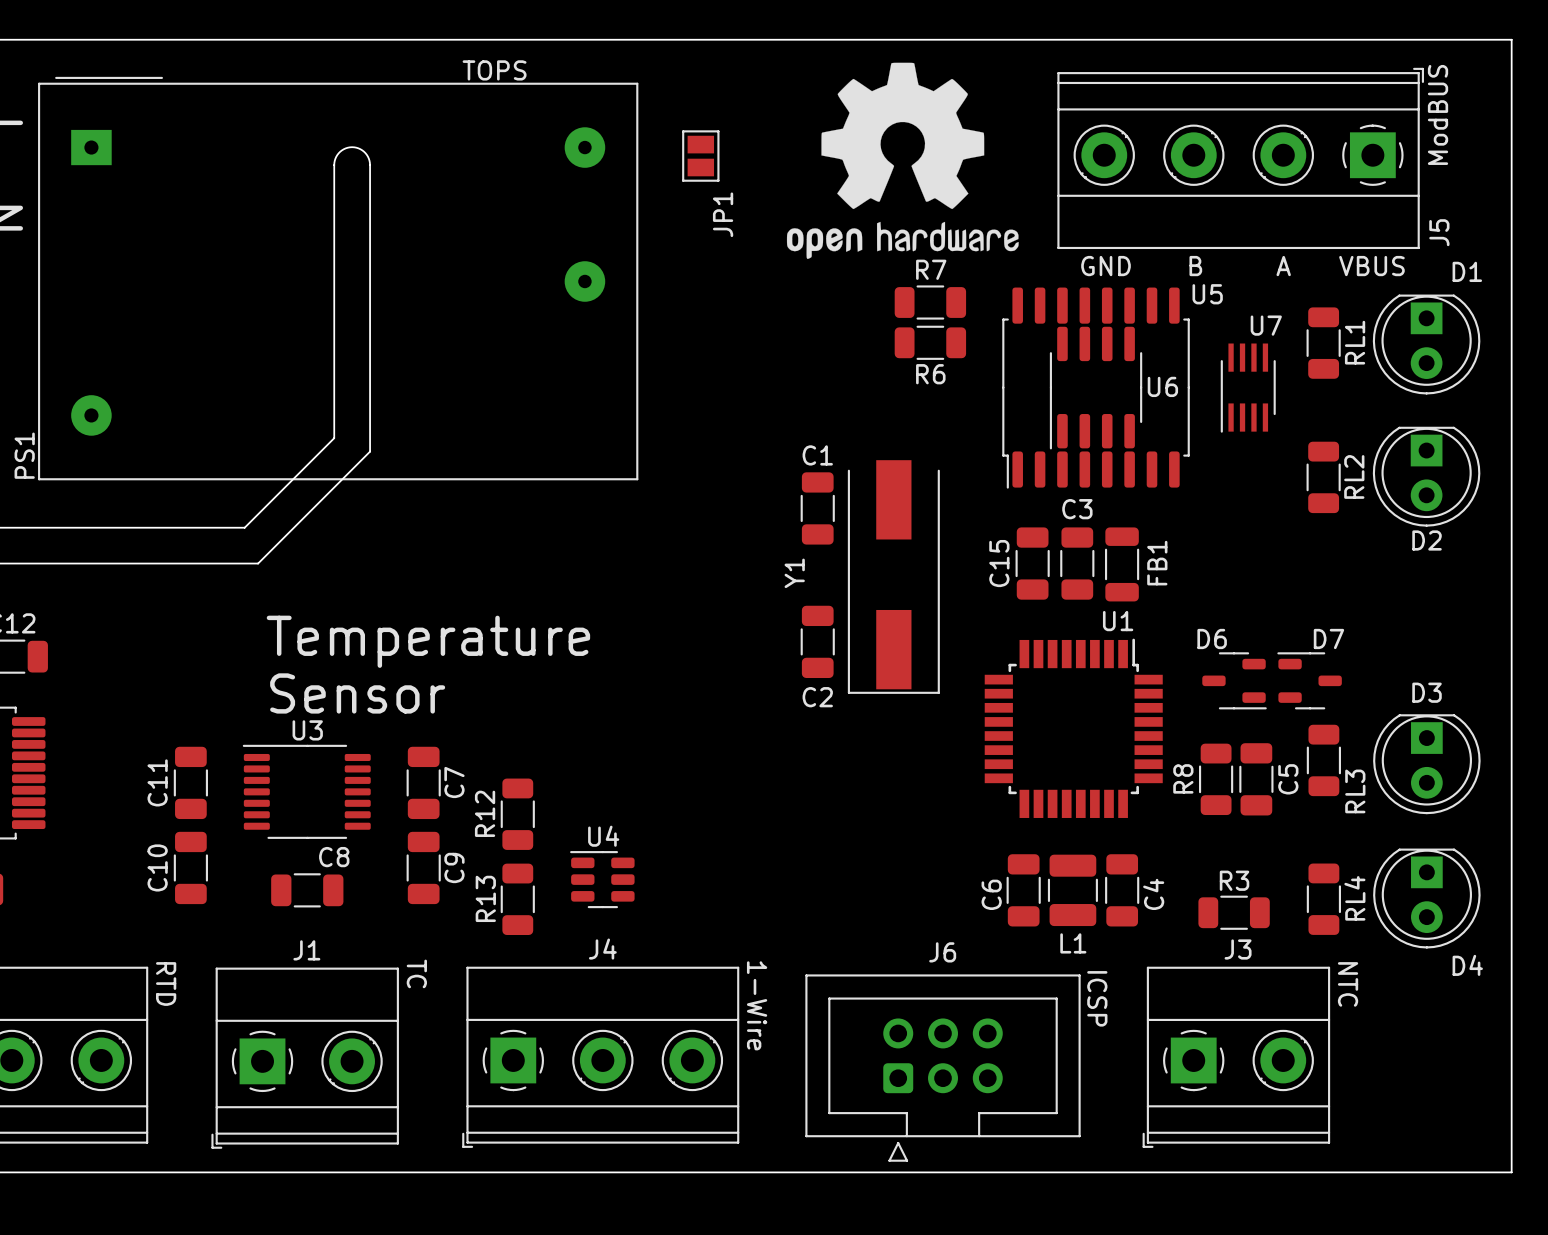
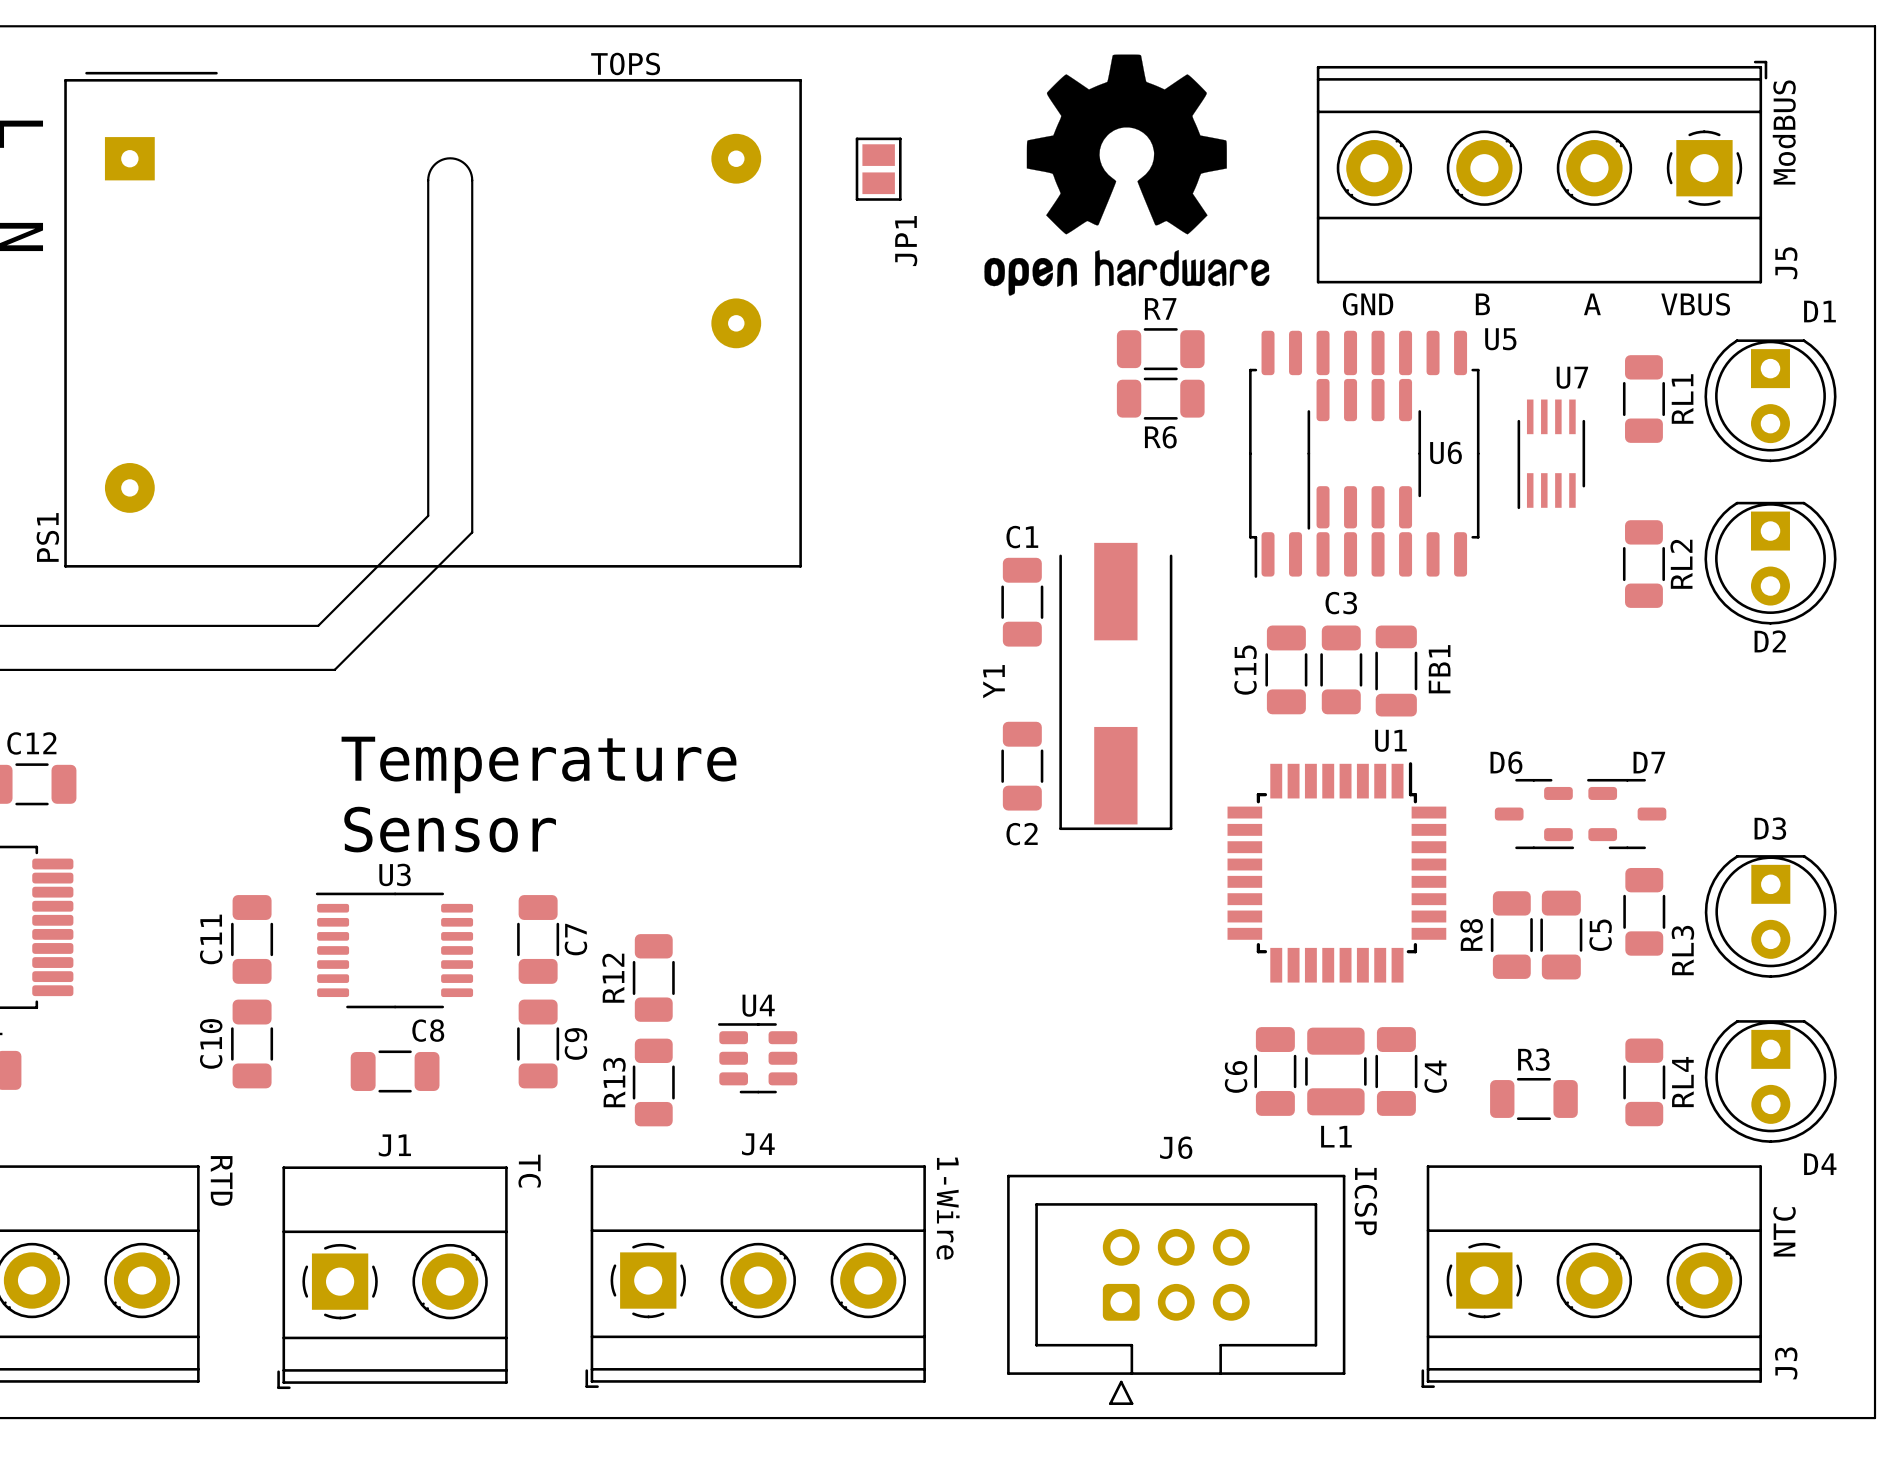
J3 name position: J3 (1238, 949) -> J3 (1786, 1363)
J3 footprint: [1142, 966, 1331, 1148] -> [1421, 1165, 1762, 1388]
text rotation: 0° (1348, 984) -> 180° (1784, 1231)
text position: NTC (1348, 984) -> NTC (1784, 1231)

